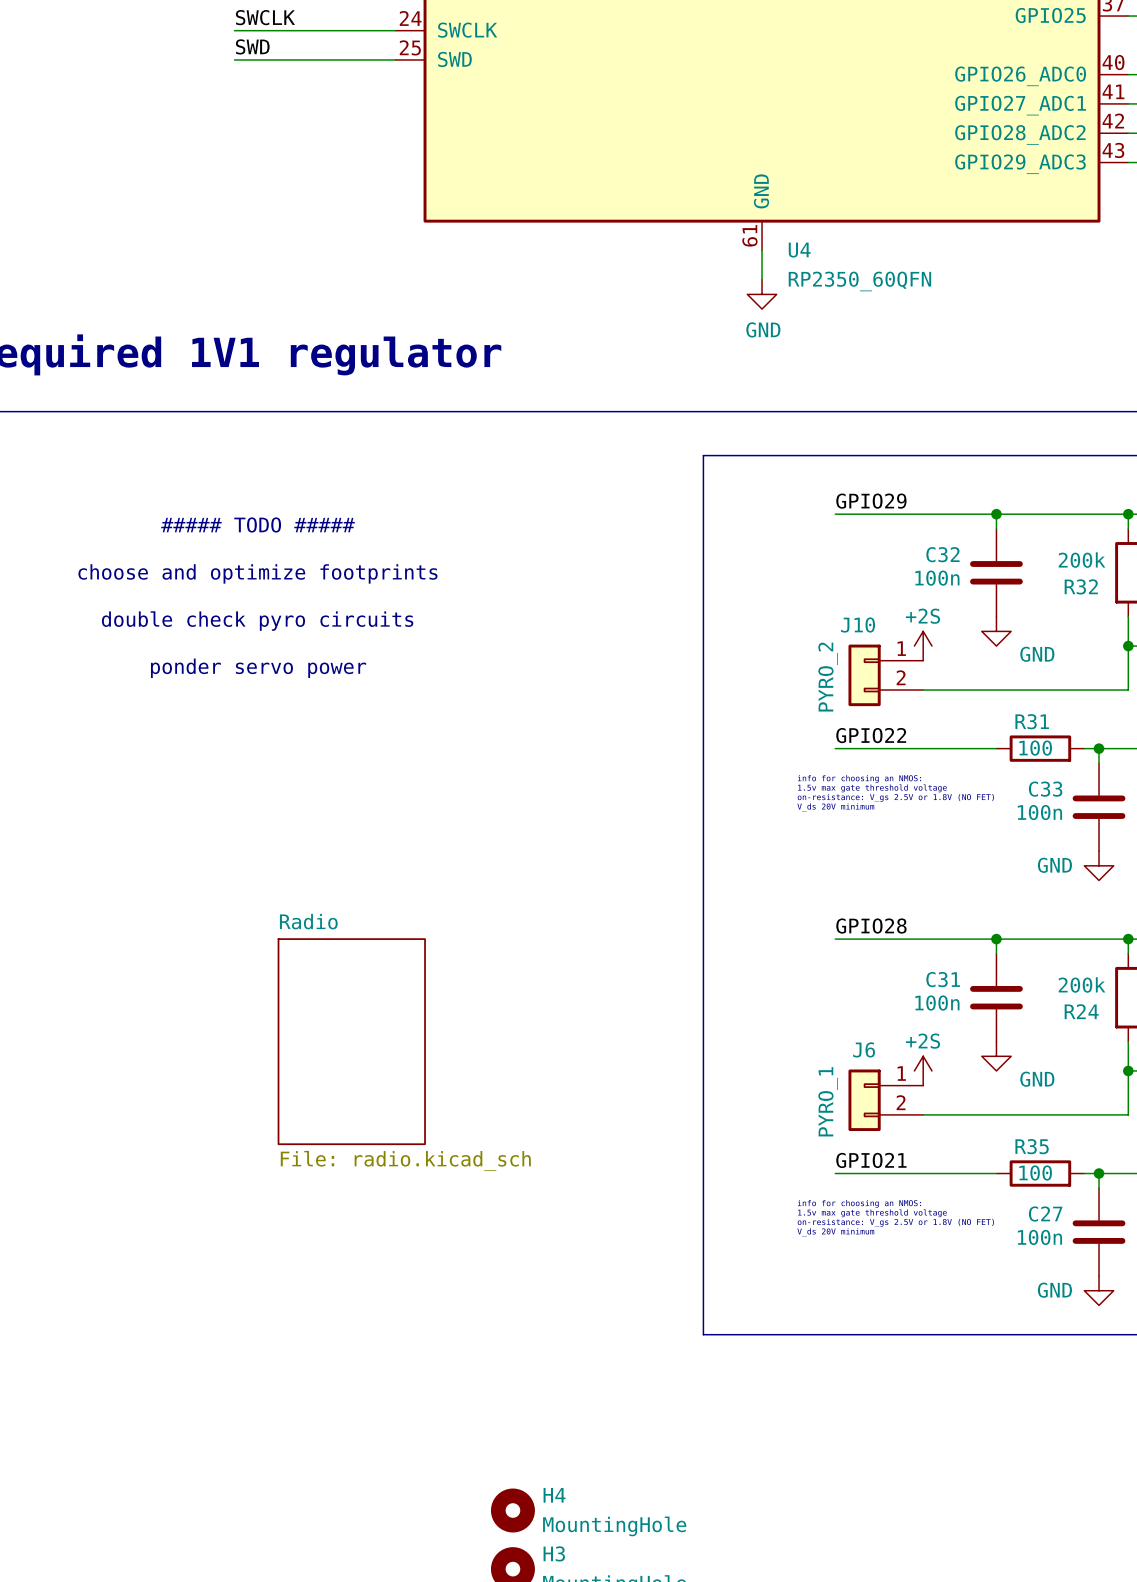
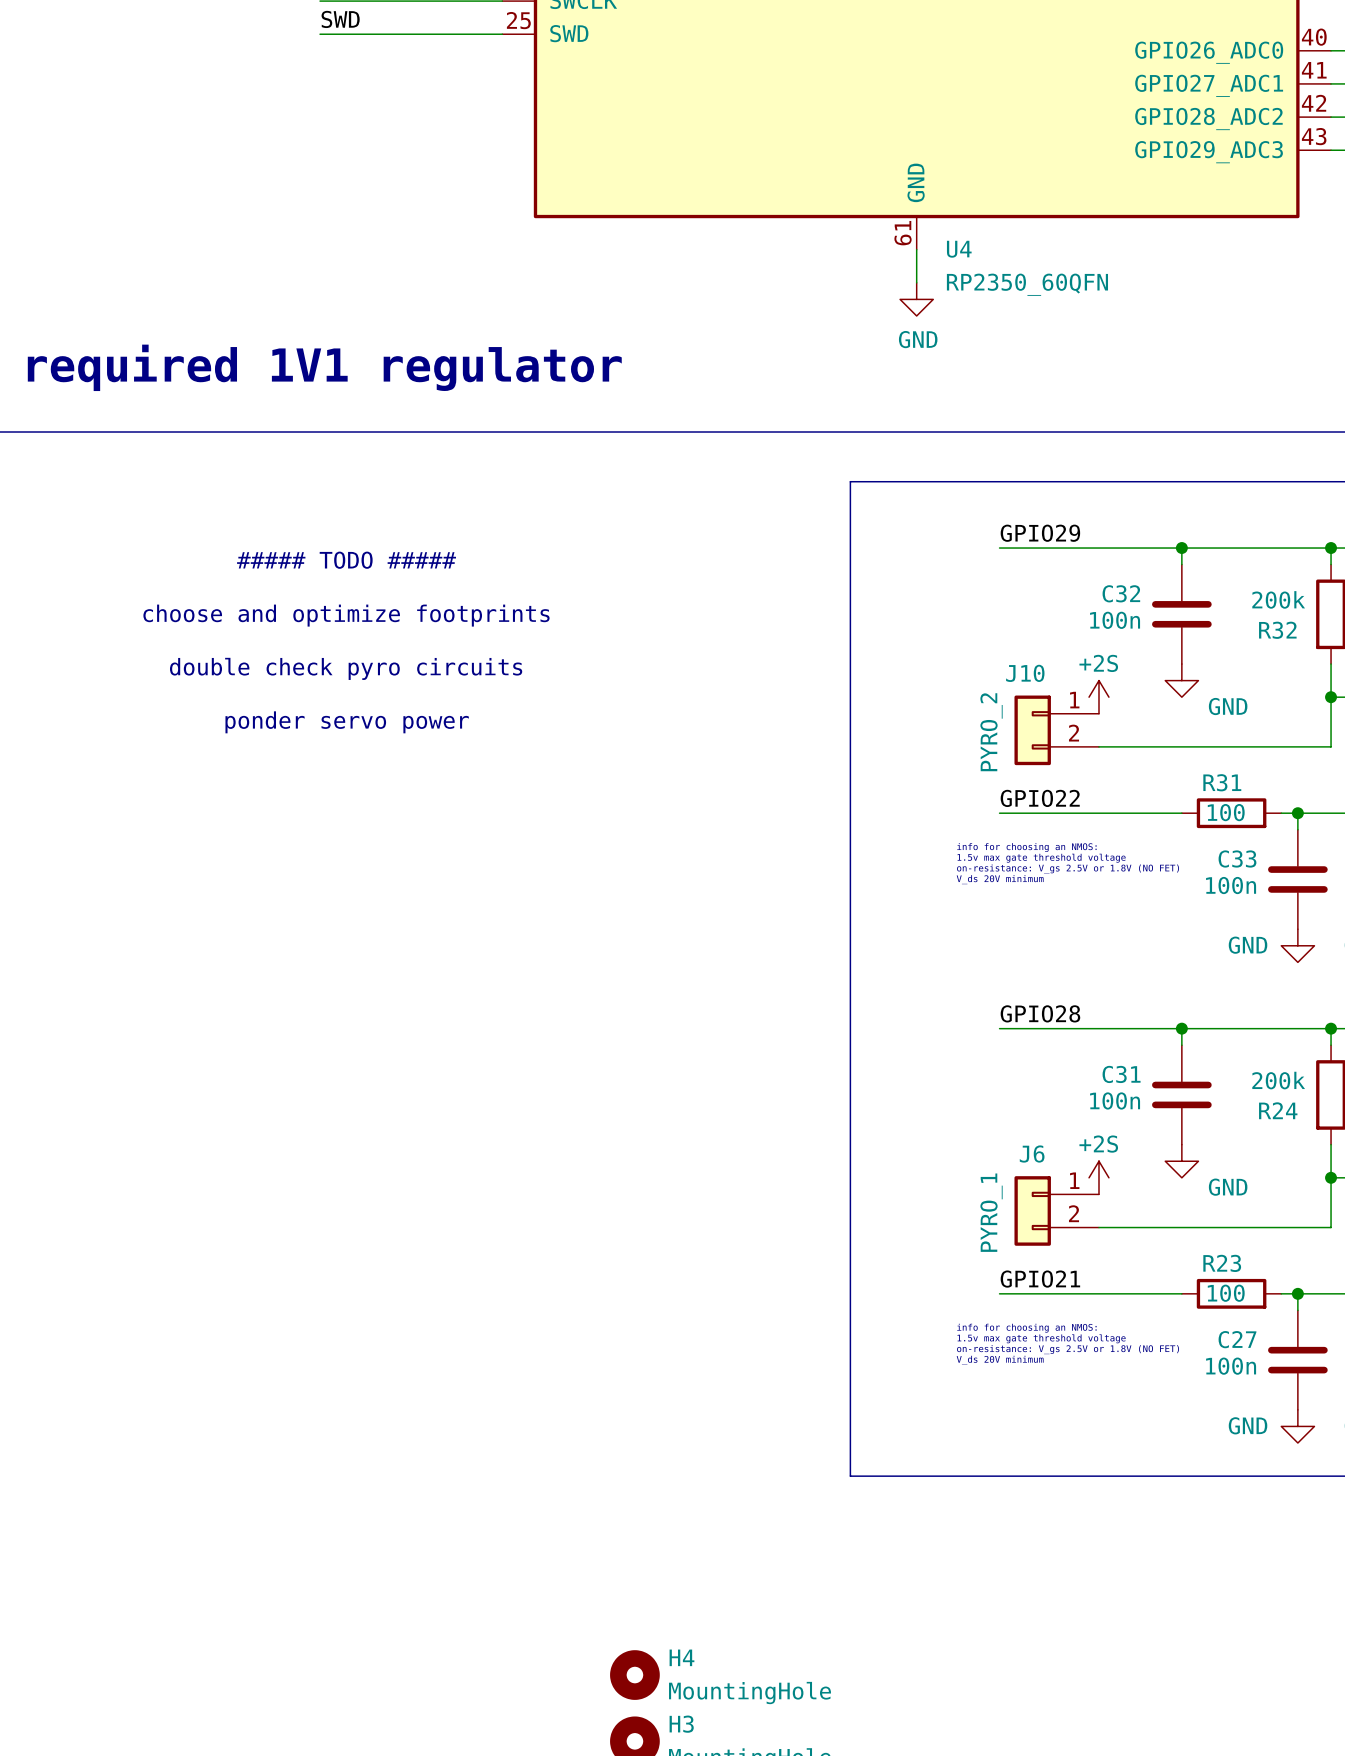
sheet Radio: File: radio.kicad_sch (351, 1041) -> none
R35 name: R35 (1032, 1146) -> R23 (1222, 1263)

